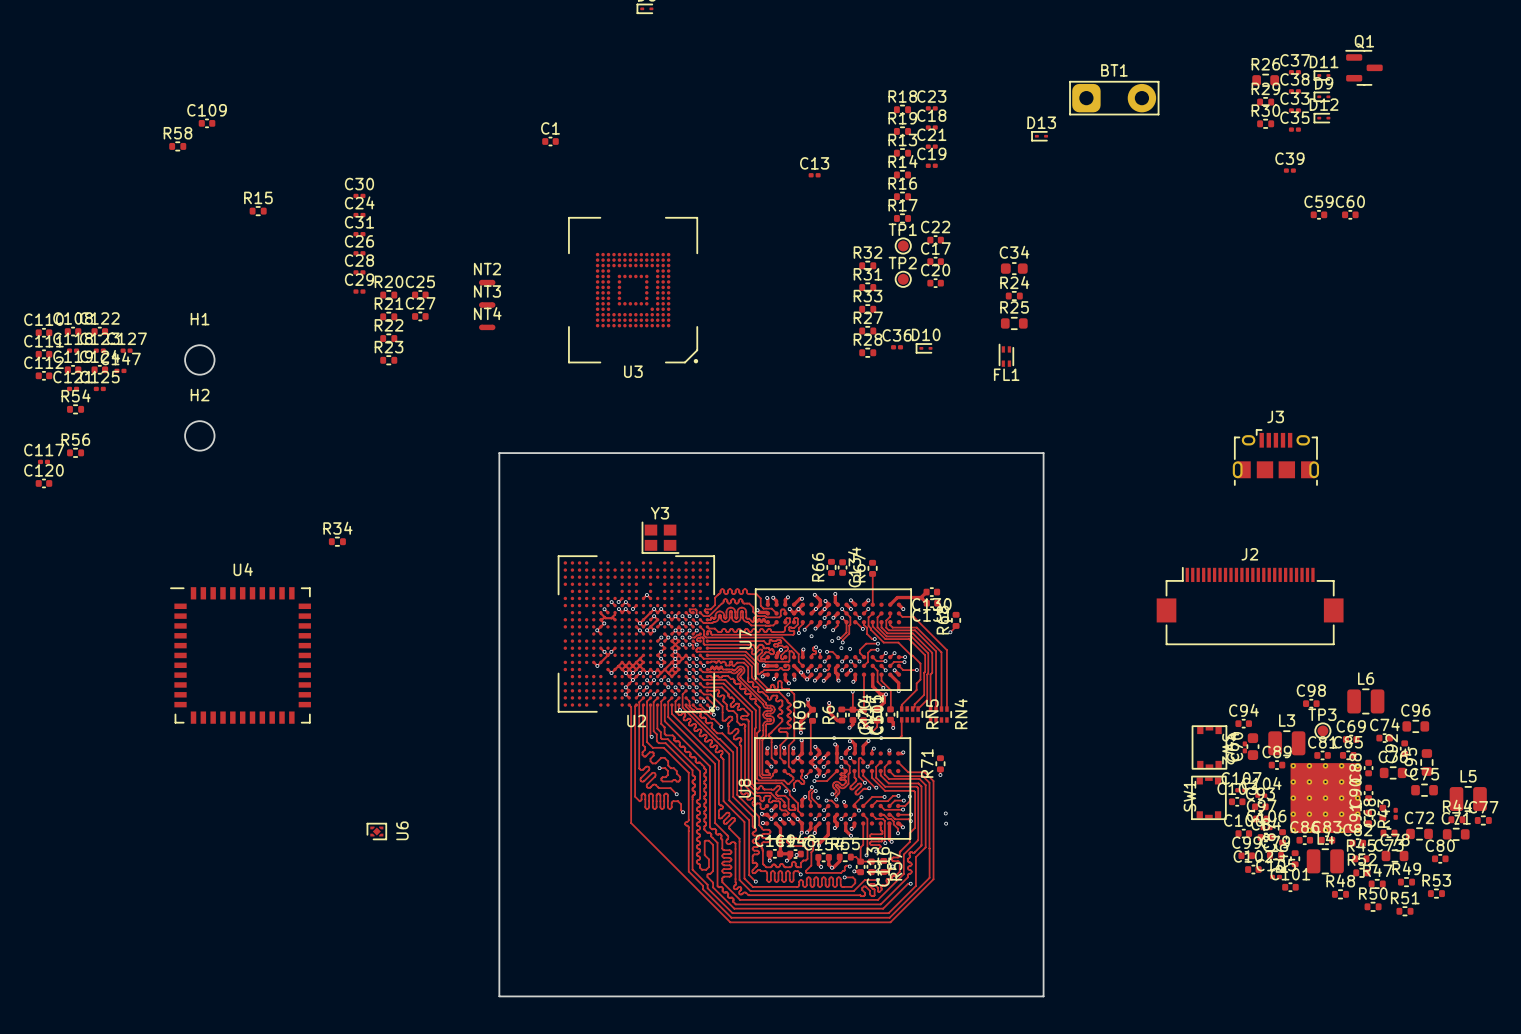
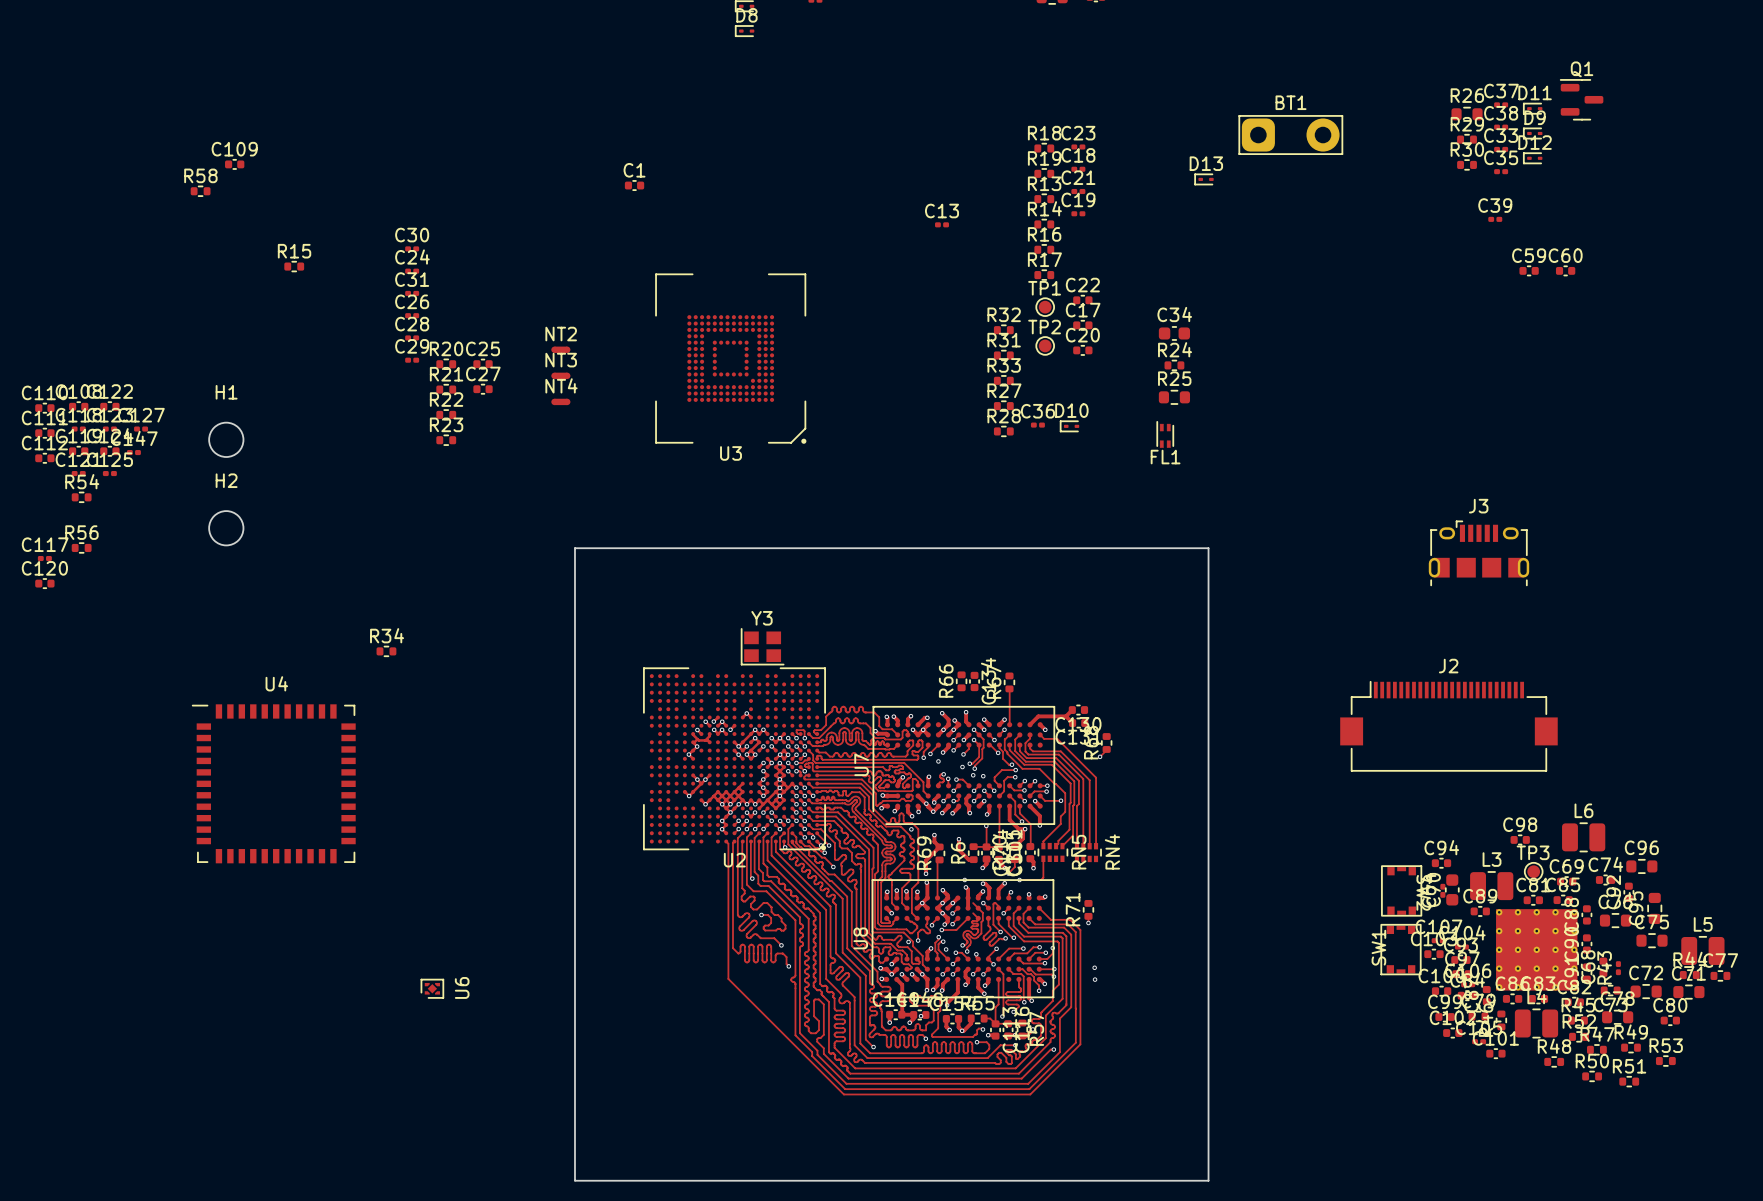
via: (841, 757) -> none
via: (841, 766) -> none

